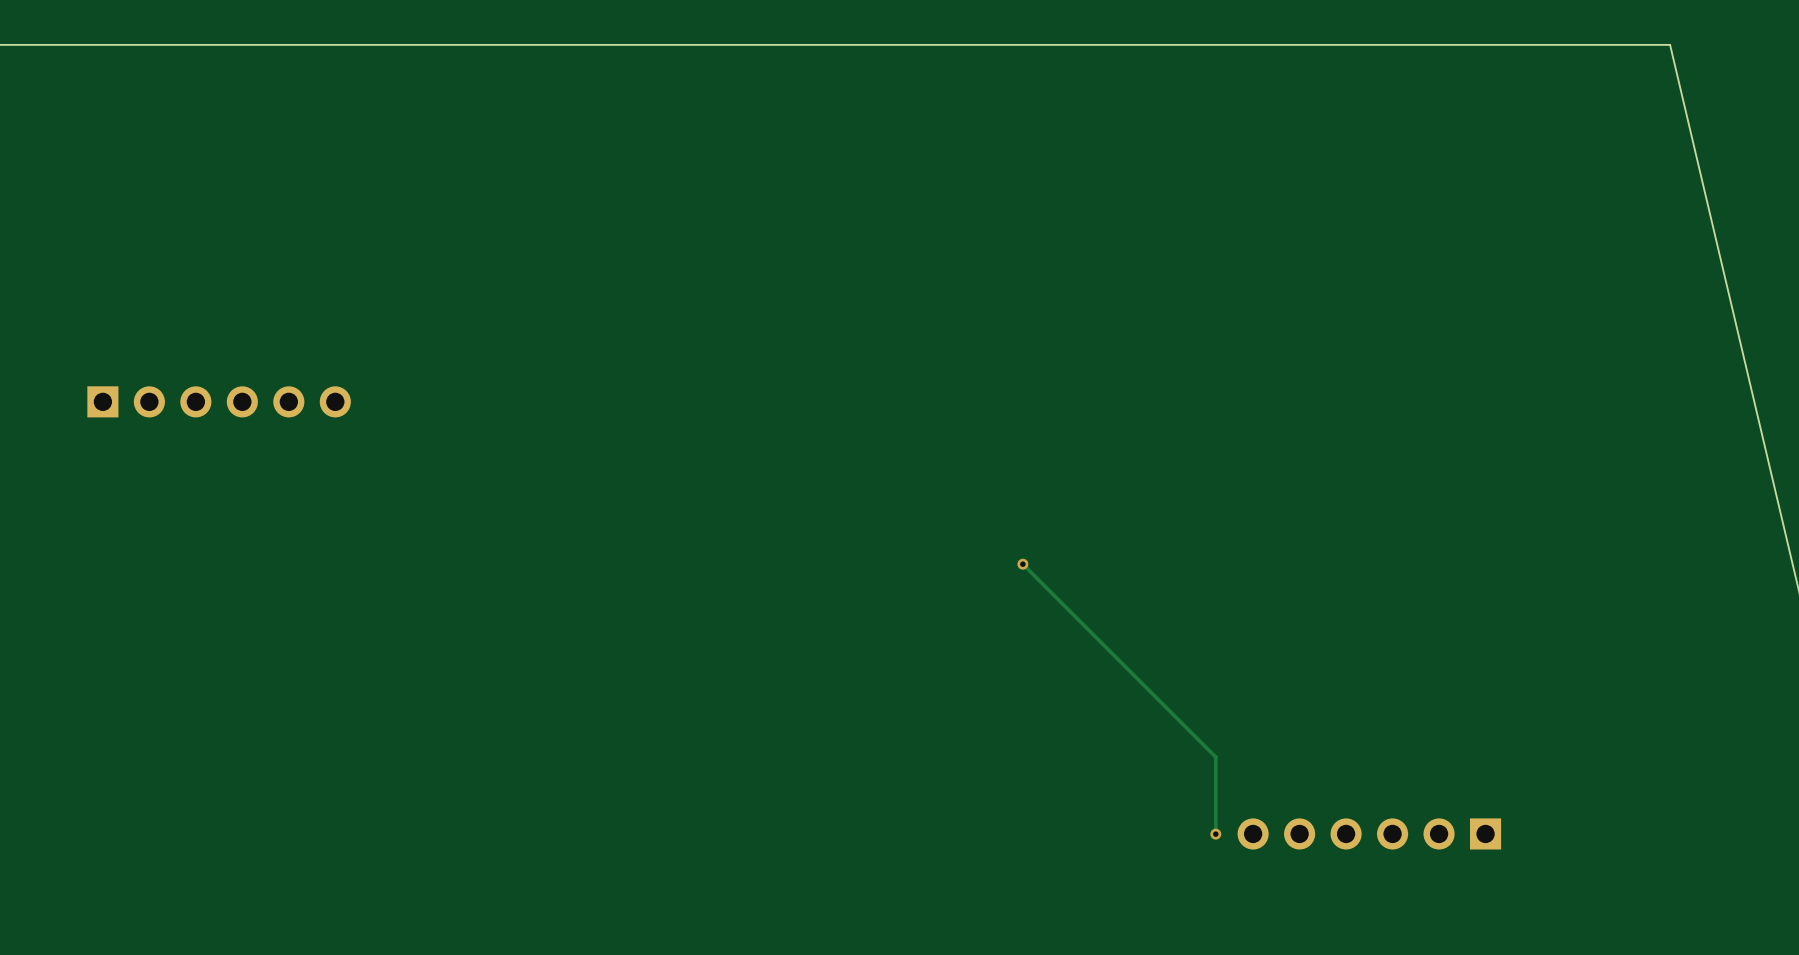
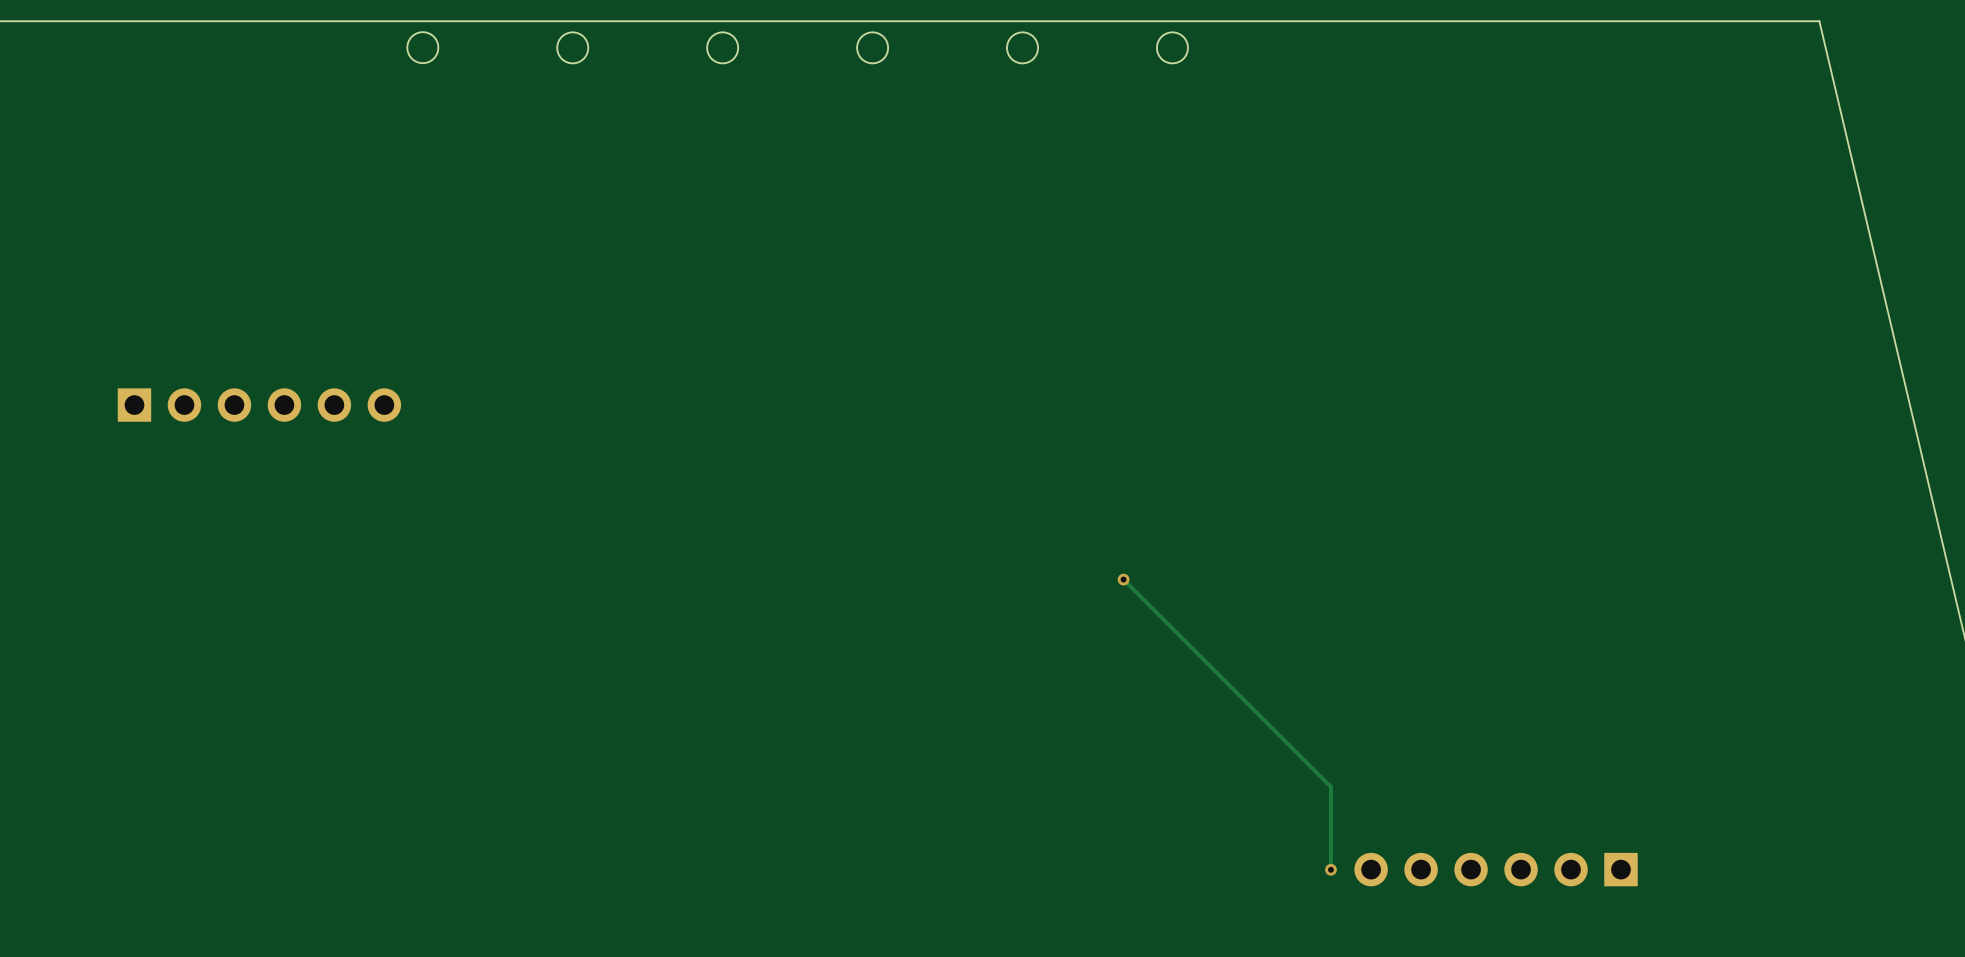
round board edge: none -> [406, 31, 439, 64]
round board edge: none -> [556, 31, 589, 64]
round board edge: none -> [706, 31, 739, 64]
round board edge: none -> [856, 31, 889, 64]
round board edge: none -> [1006, 31, 1039, 64]
round board edge: none -> [1156, 31, 1189, 64]

